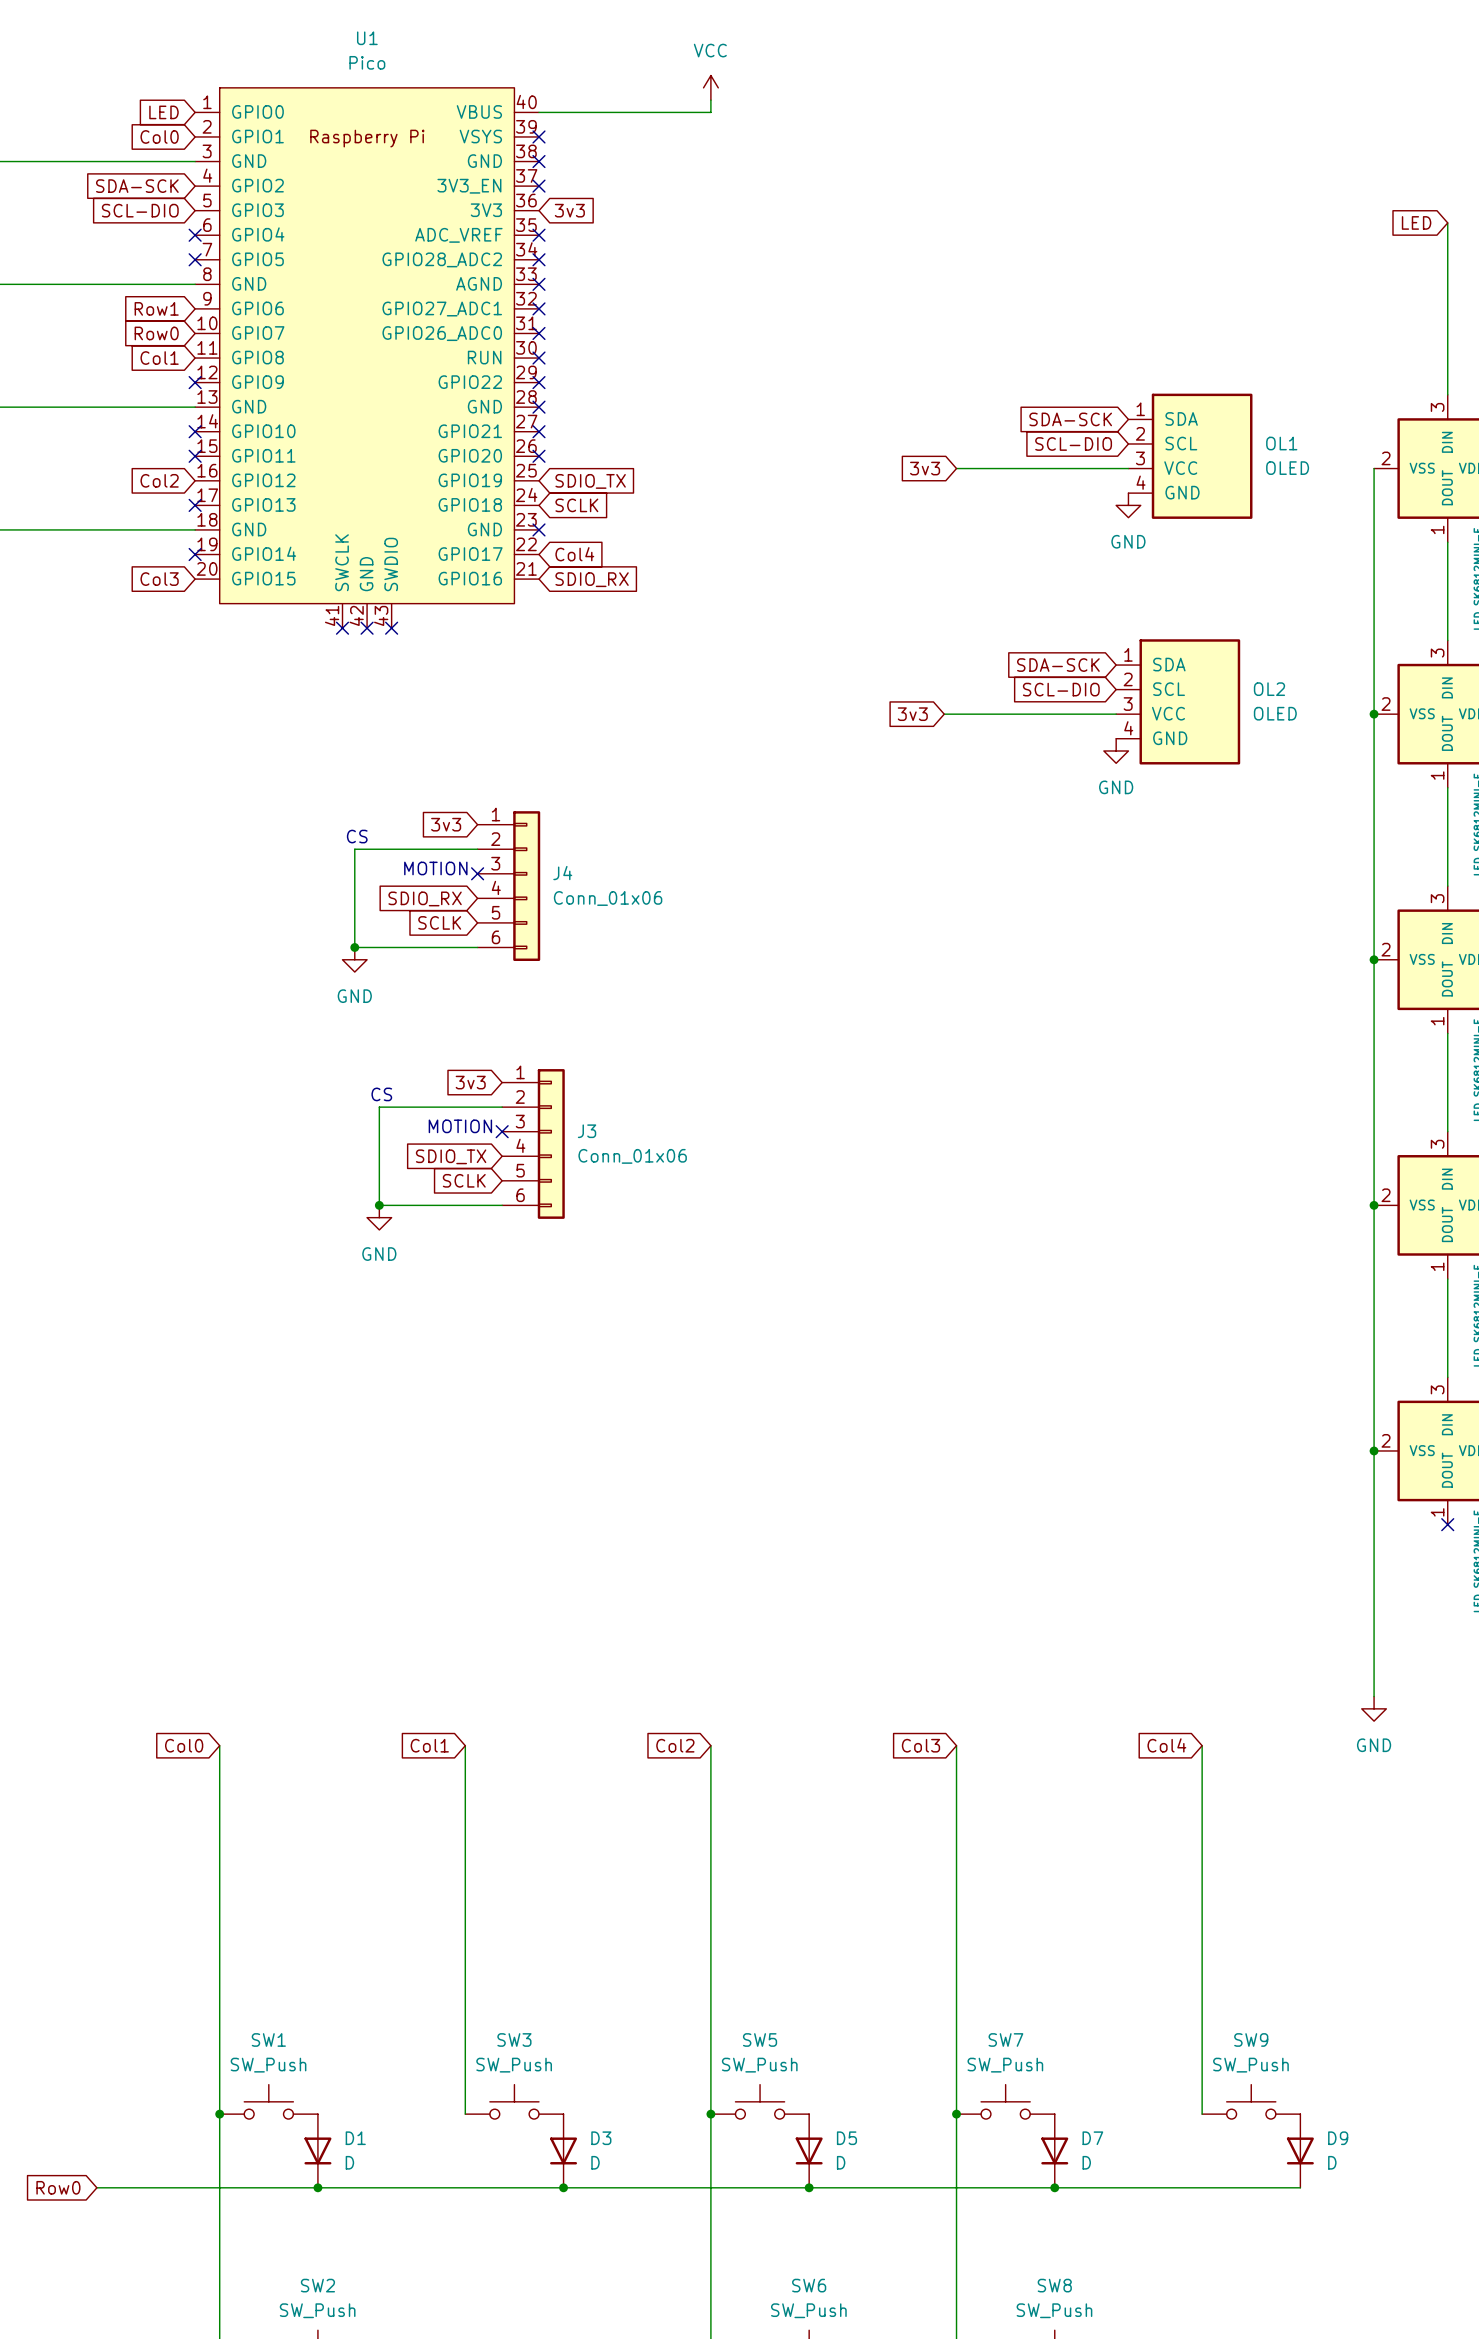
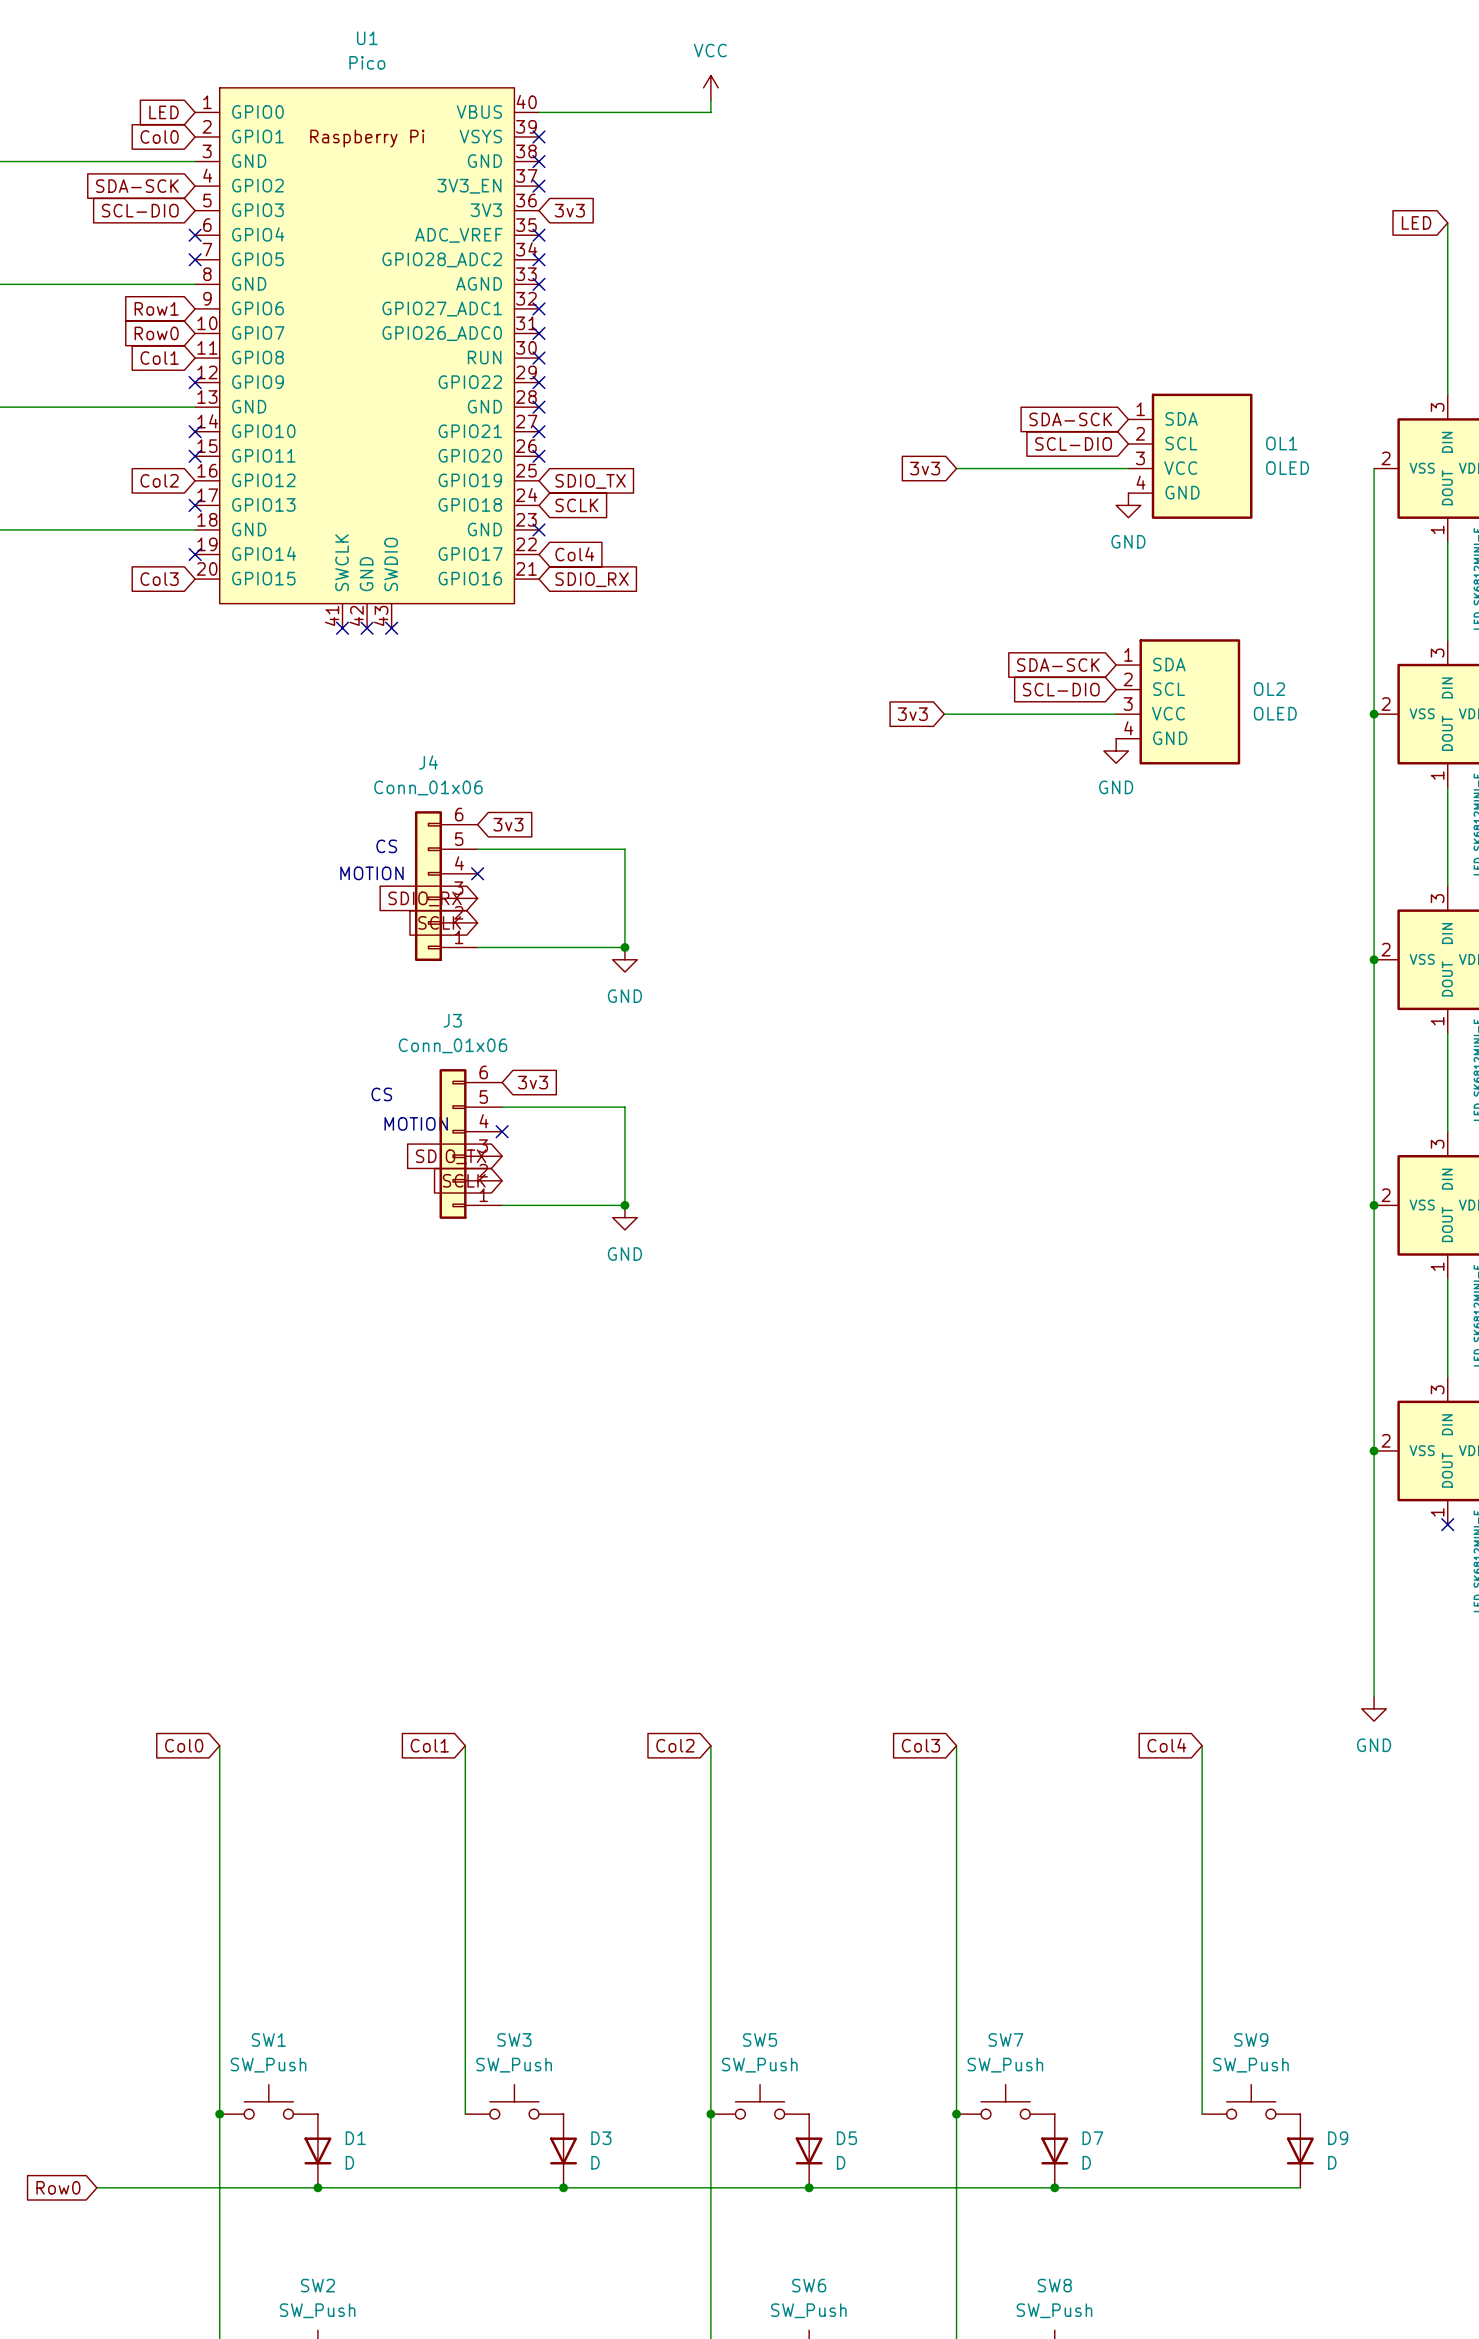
global label rotation: 0° (446, 824) -> 180° (508, 824)
global label position: 3v3 (446, 824) -> 3v3 (508, 824)
text position: CS (357, 836) -> CS (386, 846)
wire: (477, 849) (354, 849) (354, 947) (477, 947) -> (477, 849) (624, 849) (624, 947) (477, 947)
text position: MOTION (435, 868) -> MOTION (371, 873)
J4 name position: J4 (562, 873) -> J4 (428, 762)
J4 rotation: 0° (526, 886) -> 180° (428, 886)
J4 value position: Conn_01x06 (608, 898) -> Conn_01x06 (428, 787)
junction: (354, 947) -> none
junction: none -> (624, 947)
power symbol: GND (354, 959) -> none
power symbol: none -> GND (624, 959)
global label rotation: 0° (470, 1082) -> 180° (533, 1082)
wire: (502, 1107) (379, 1107) (379, 1205) (502, 1205) -> (502, 1107) (624, 1107) (624, 1205) (502, 1205)
text position: MOTION (460, 1126) -> MOTION (416, 1123)
J3 name position: J3 (587, 1131) -> J3 (452, 1020)
J3 rotation: 0° (551, 1143) -> 180° (453, 1143)
J3 value position: Conn_01x06 (632, 1156) -> Conn_01x06 (453, 1045)
junction: (379, 1205) -> none
junction: none -> (624, 1205)
power symbol: GND (379, 1217) -> none
power symbol: none -> GND (624, 1217)

